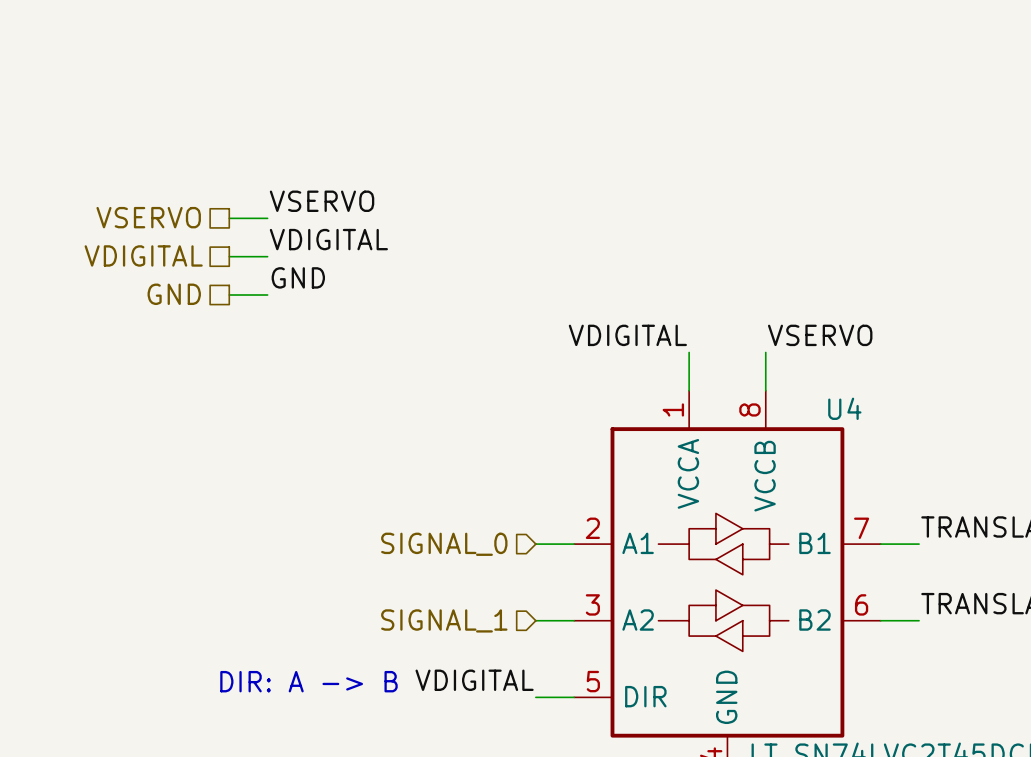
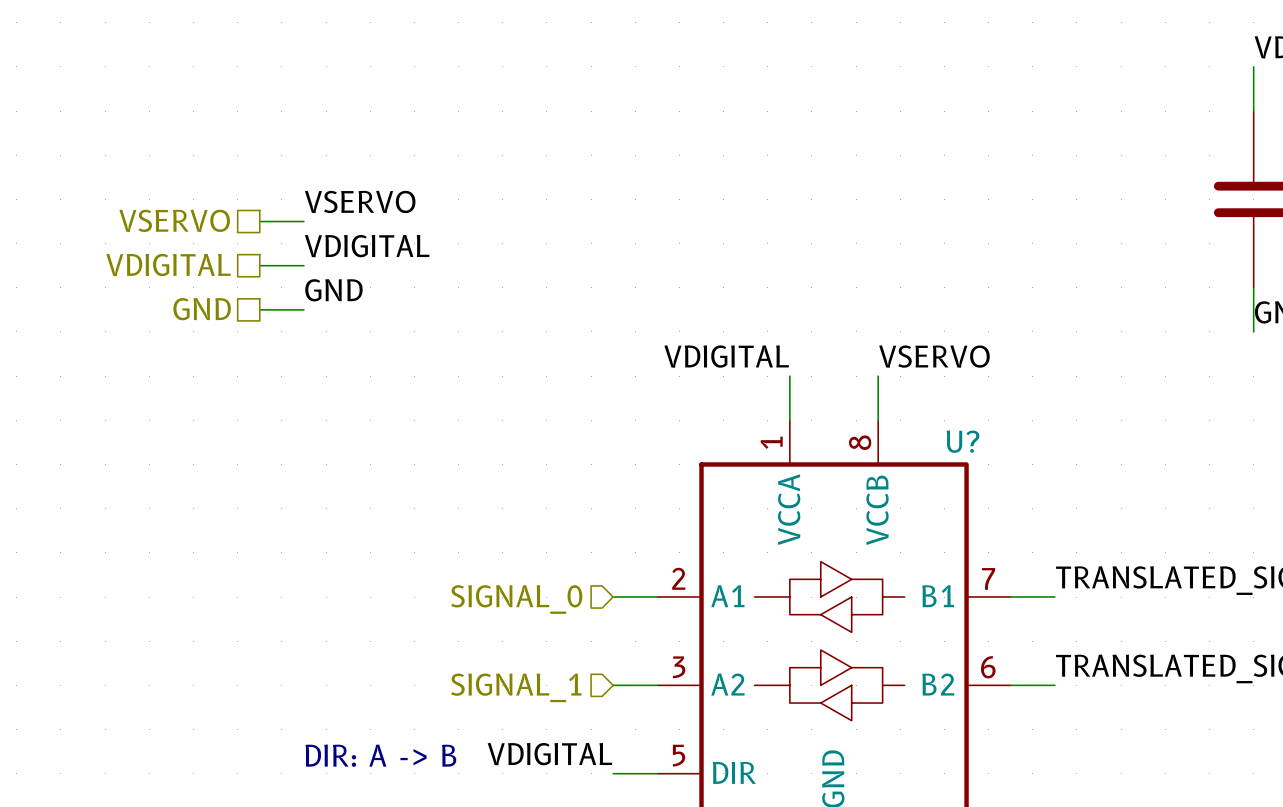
U4 name: U4 (844, 408) -> U? (962, 441)

